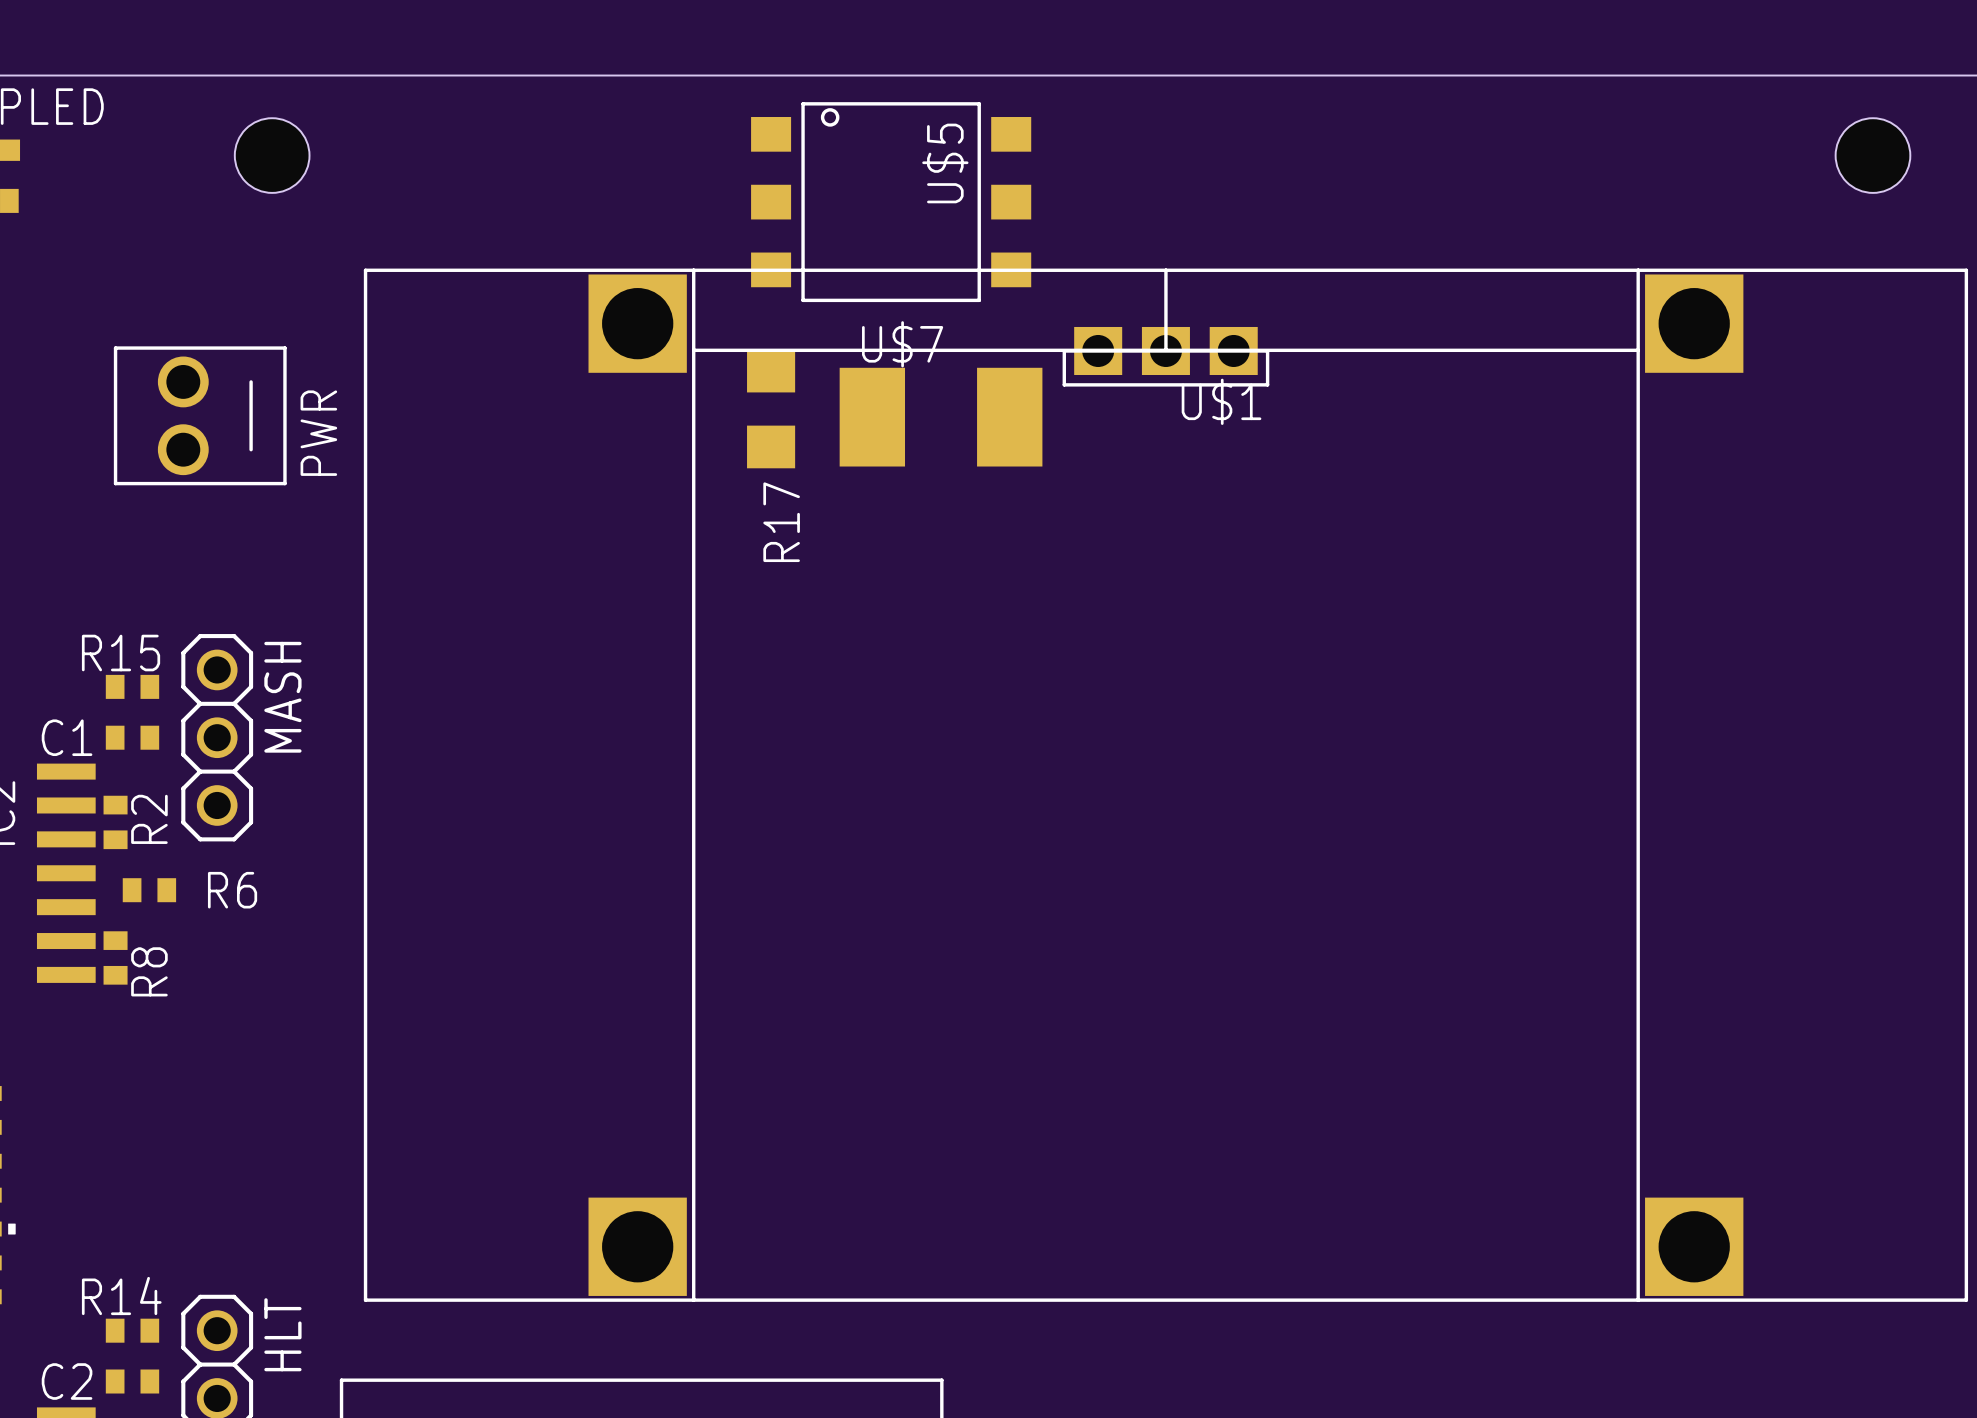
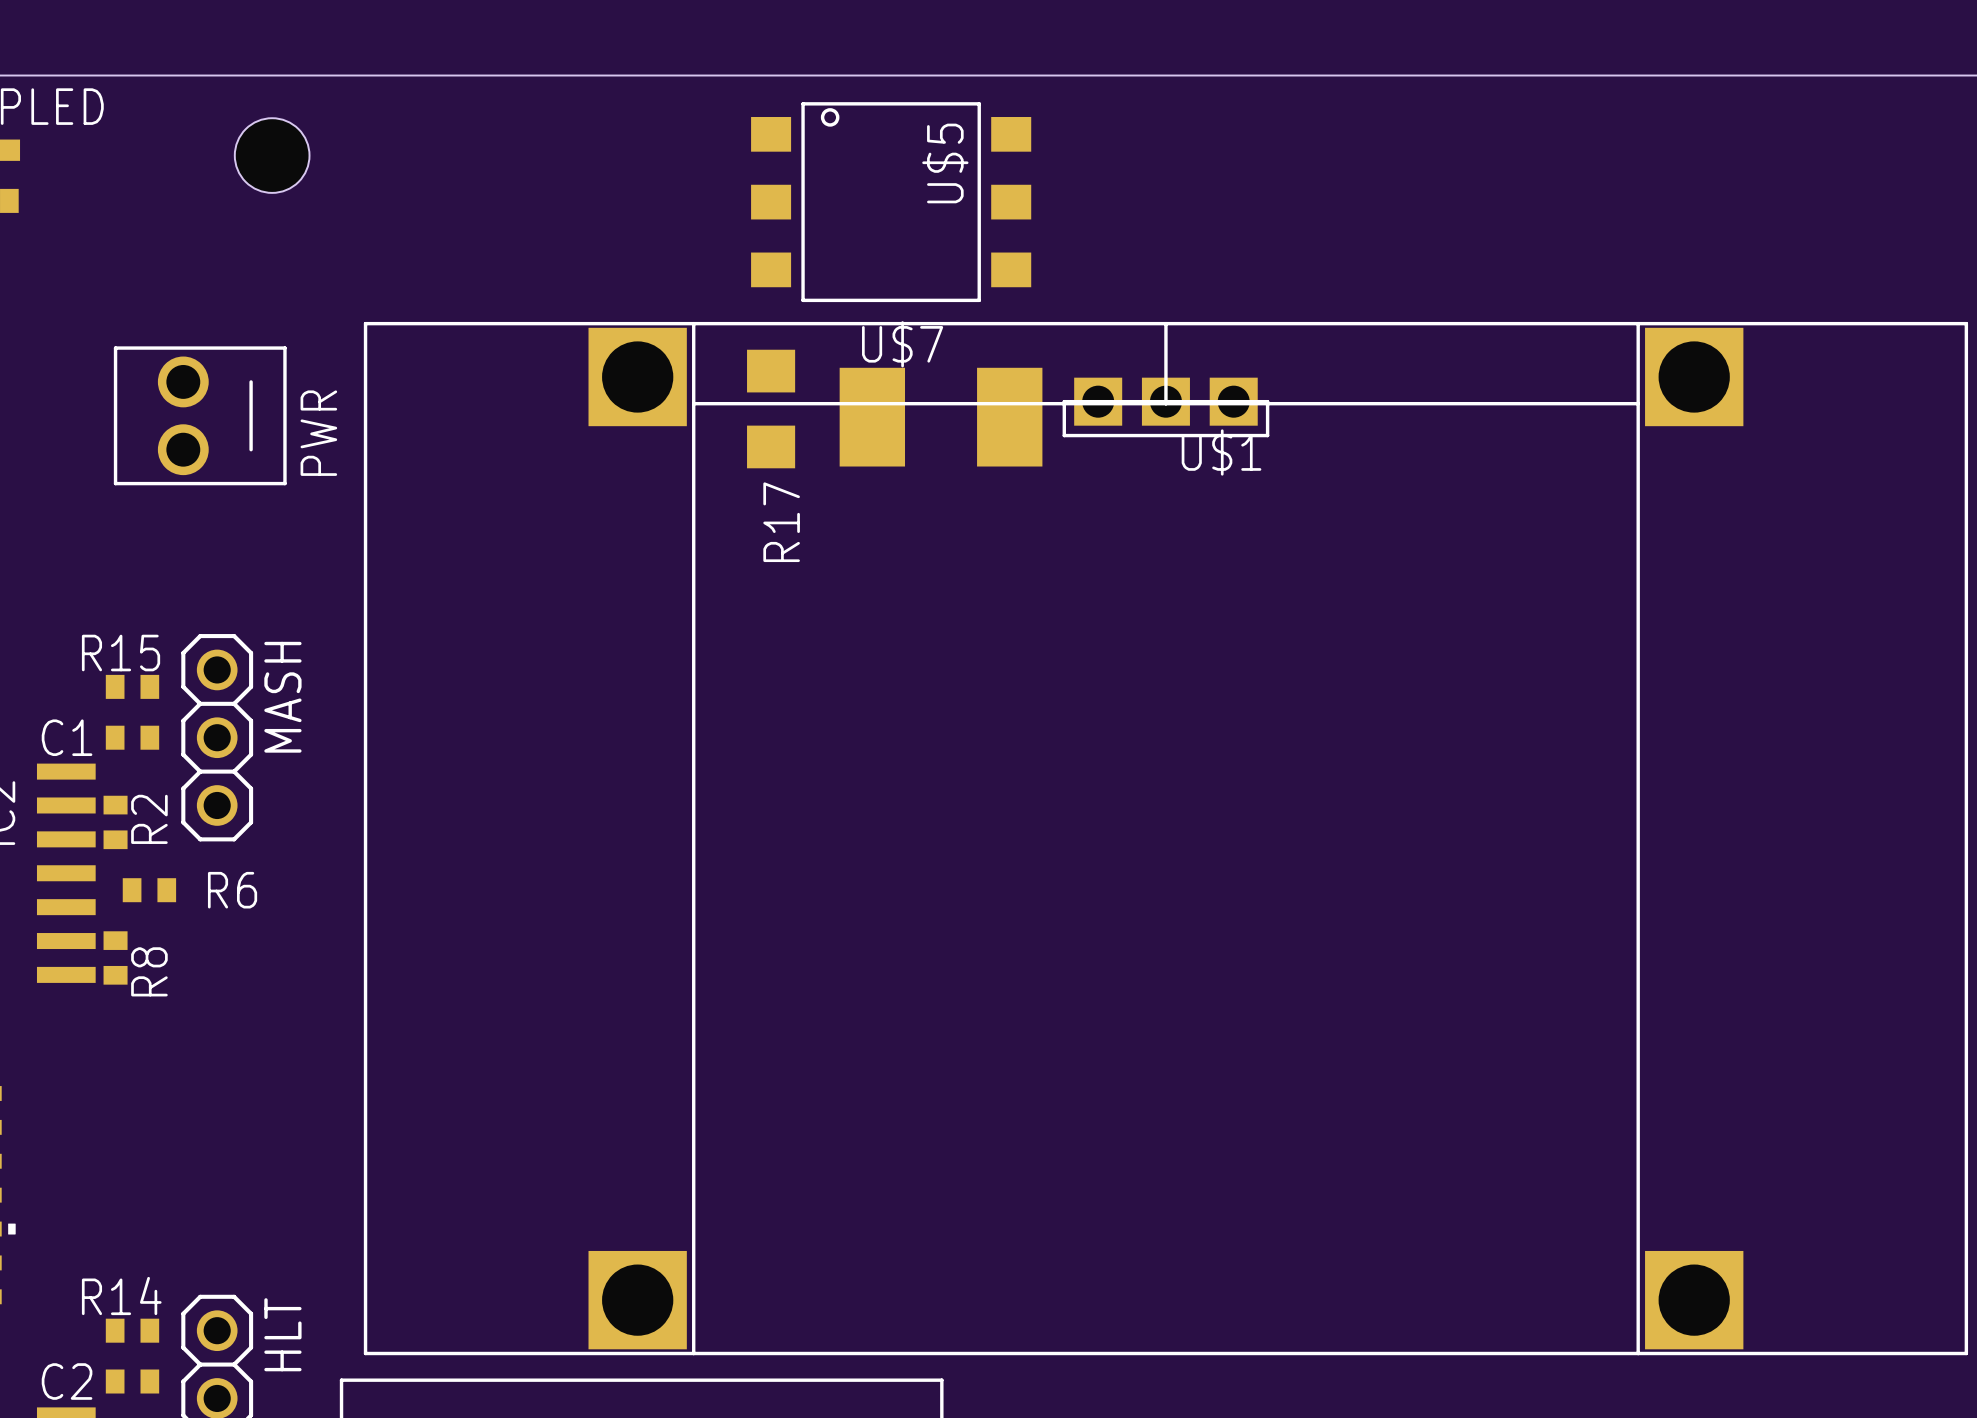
hole: (1872, 155) -> none
U$1 position: (1165, 356) -> (1165, 407)
part position: (1165, 785) -> (1165, 838)

